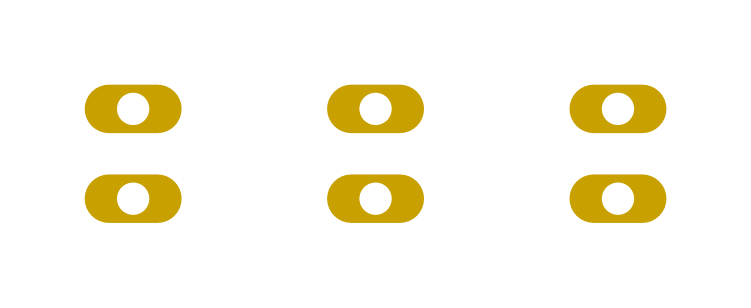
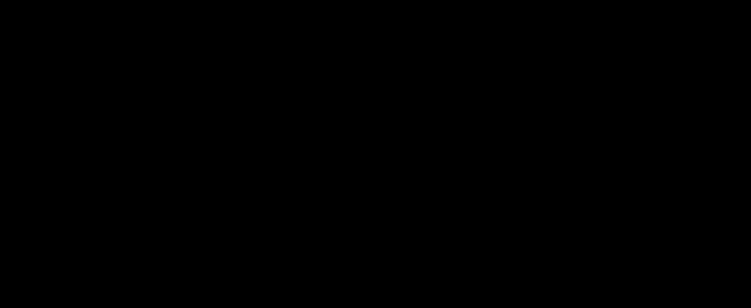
part: (133, 153) -> none
part: (375, 153) -> none
part: (617, 153) -> none

